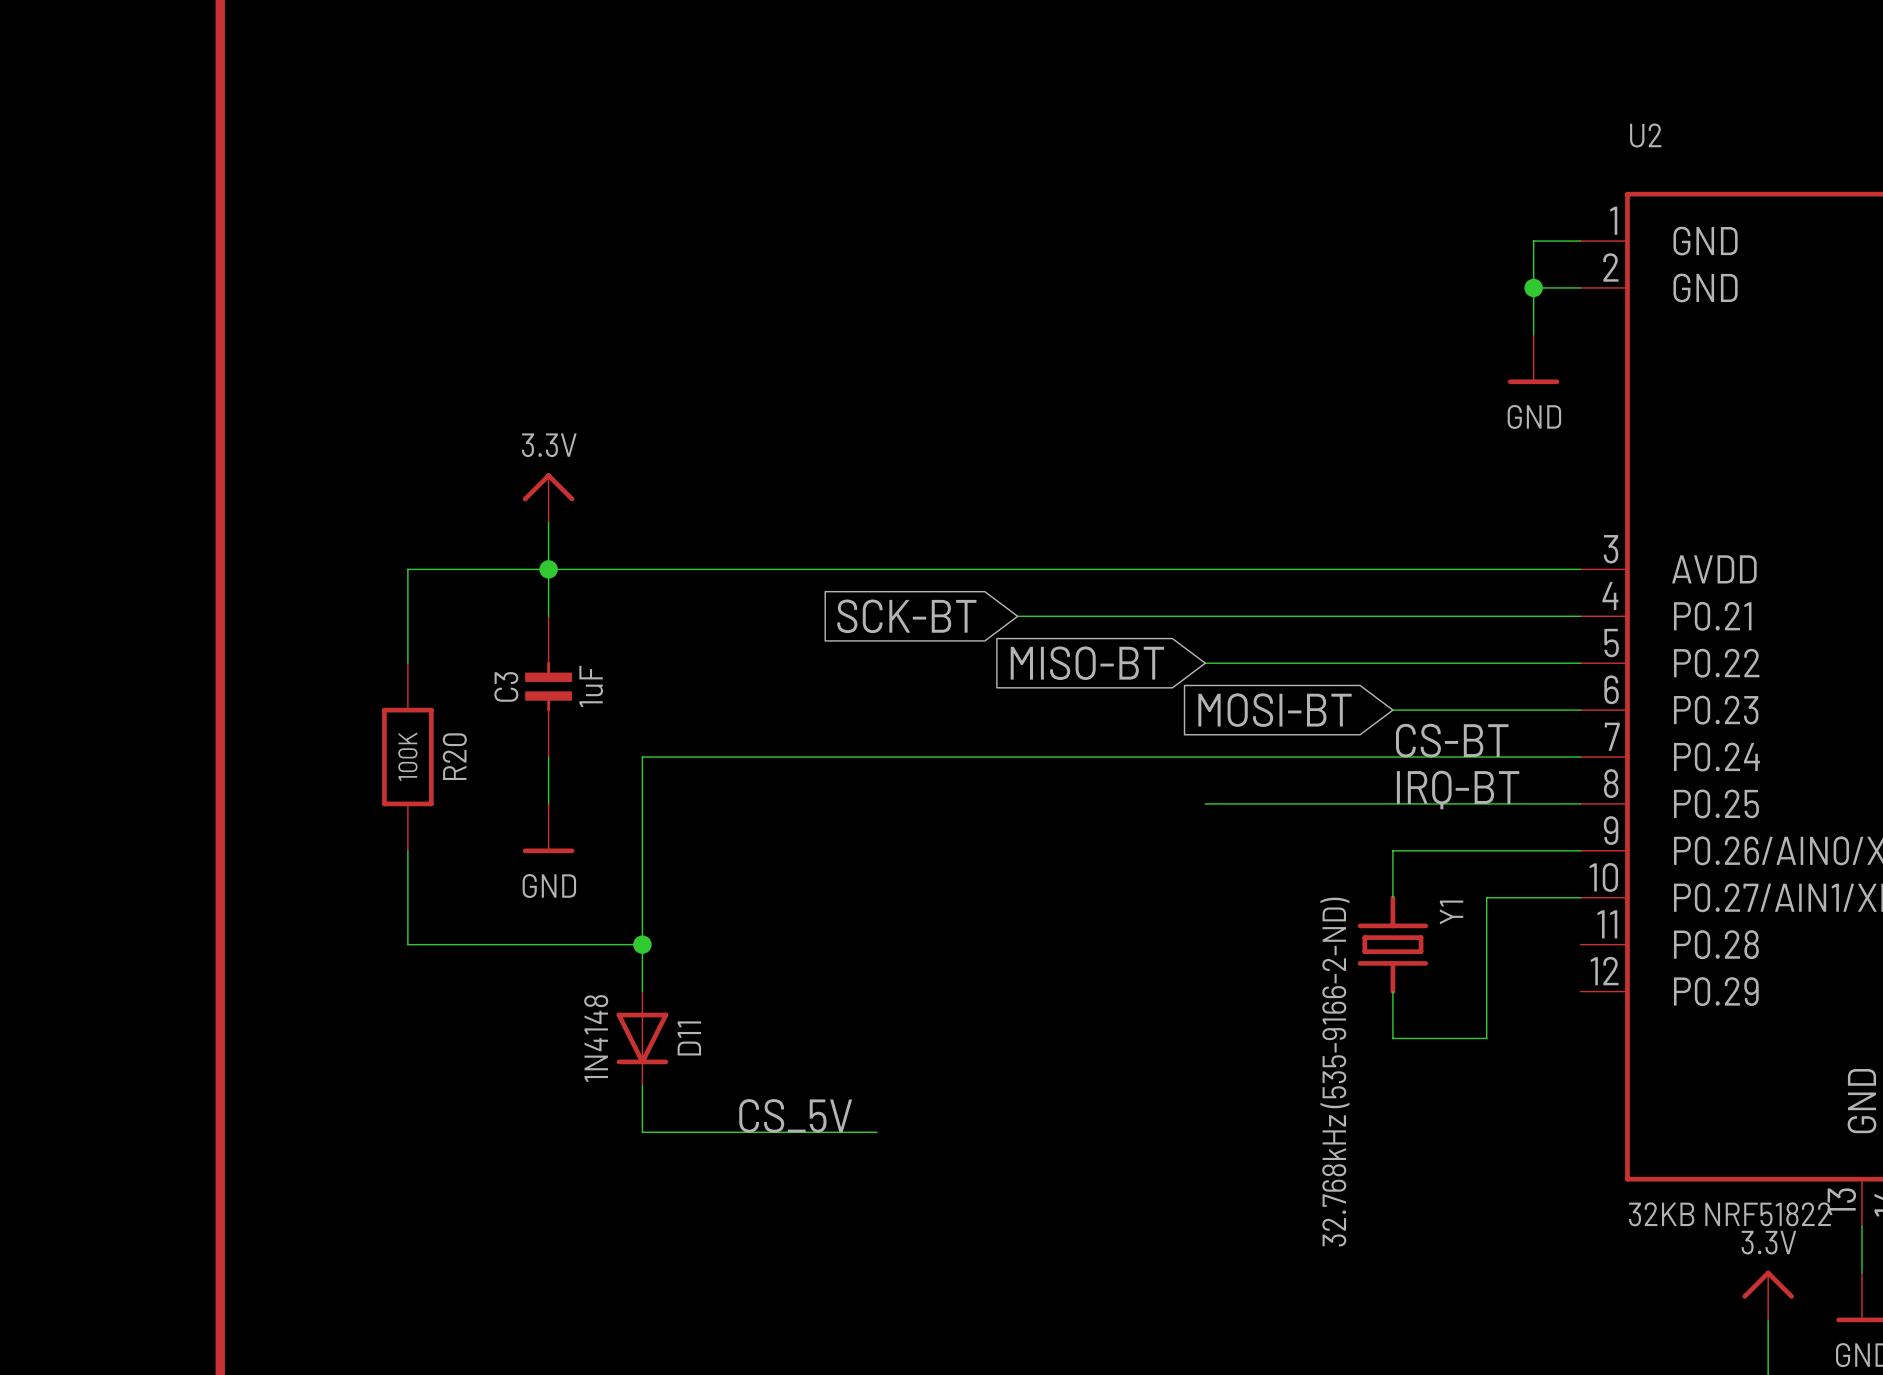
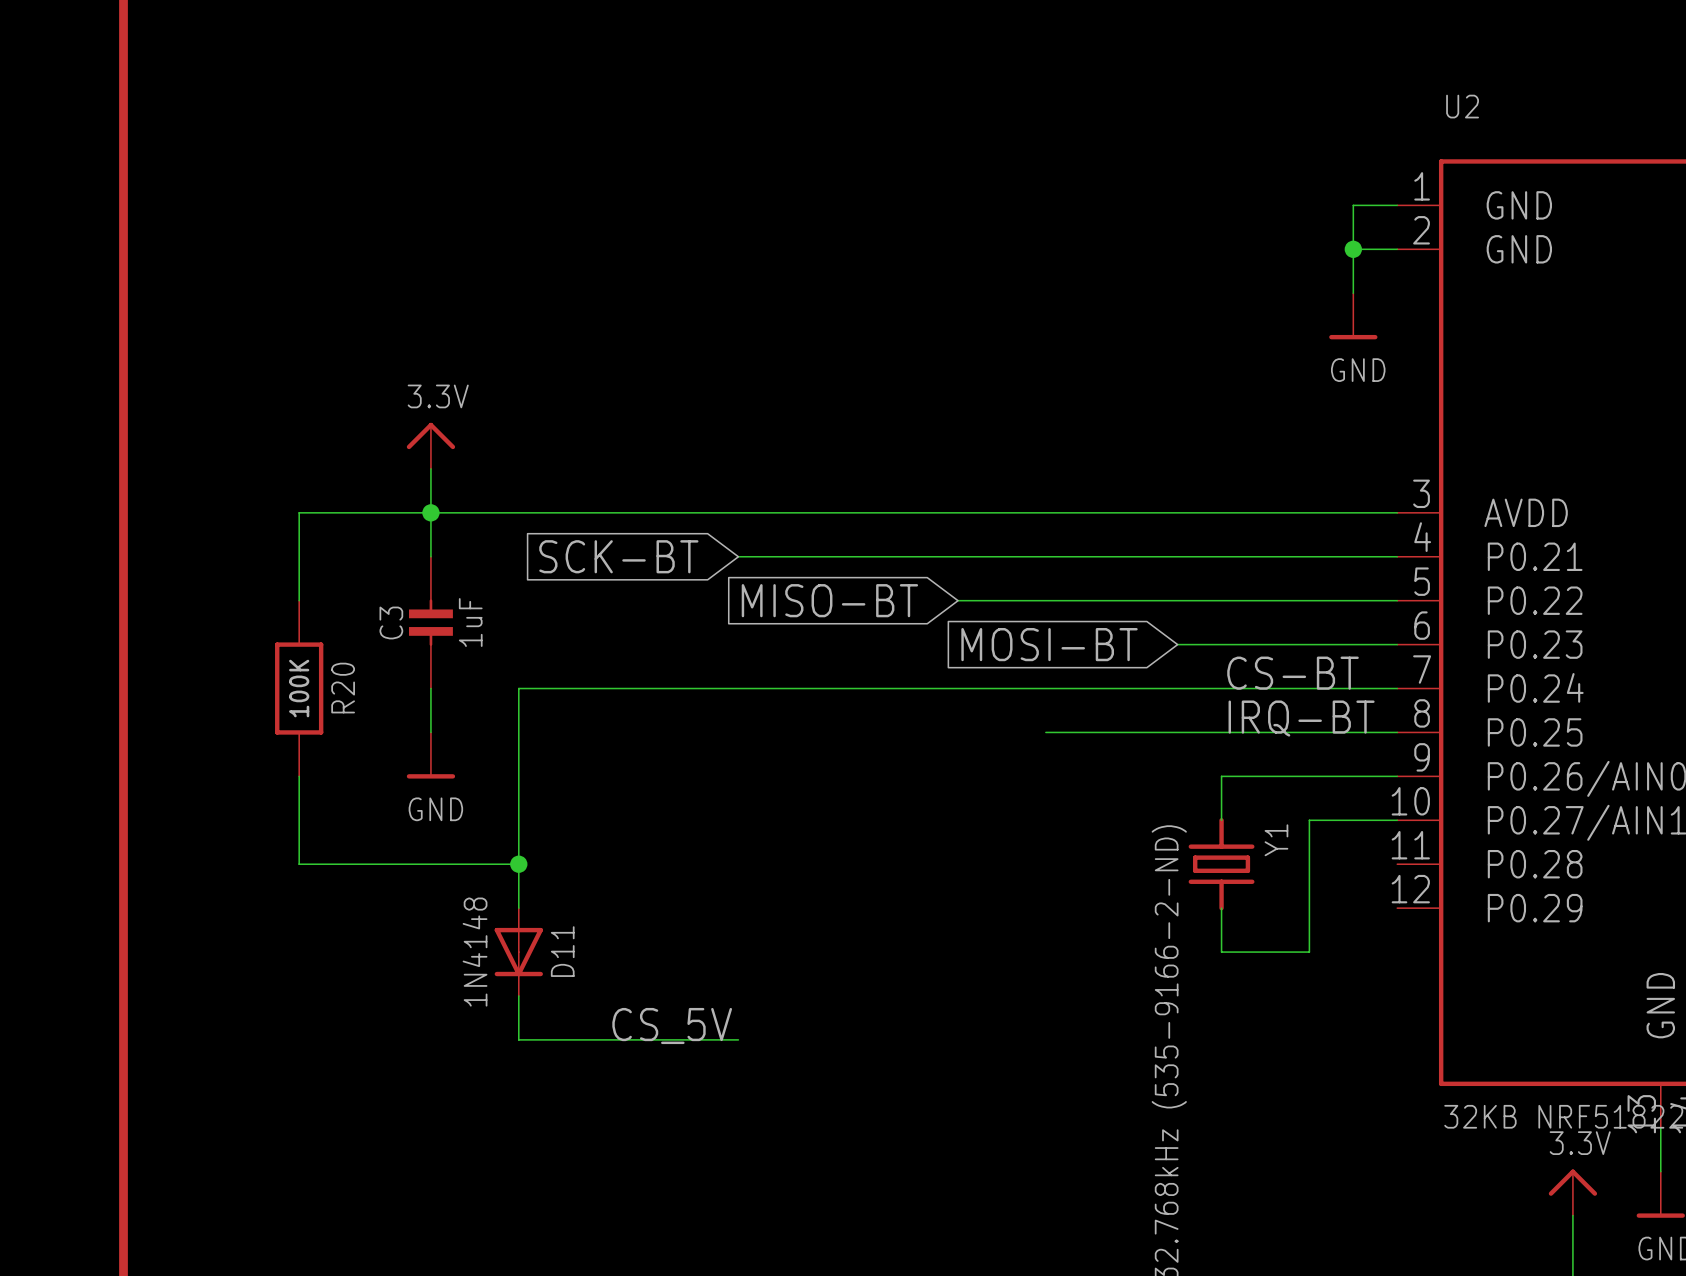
wire: none -> (738, 556) (870, 556)
global label position: SCK-BT (906, 616) -> SCK-BT (618, 556)
global label position: MISO-BT (1087, 663) -> MISO-BT (829, 600)
wire: none -> (958, 600) (1045, 600)
global label position: MOSI-BT (1275, 710) -> MOSI-BT (1049, 644)
wire: none -> (1177, 644) (1221, 644)

